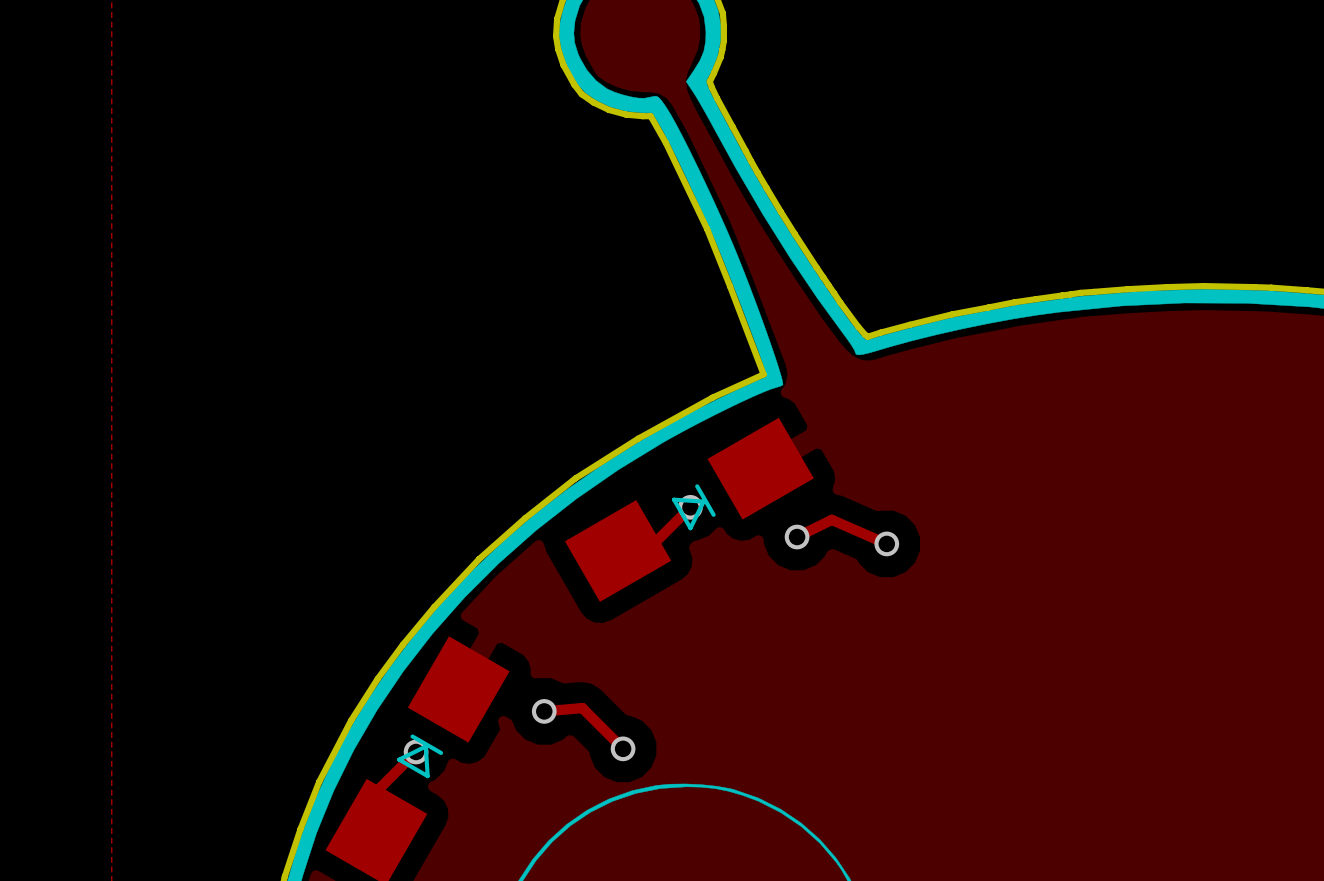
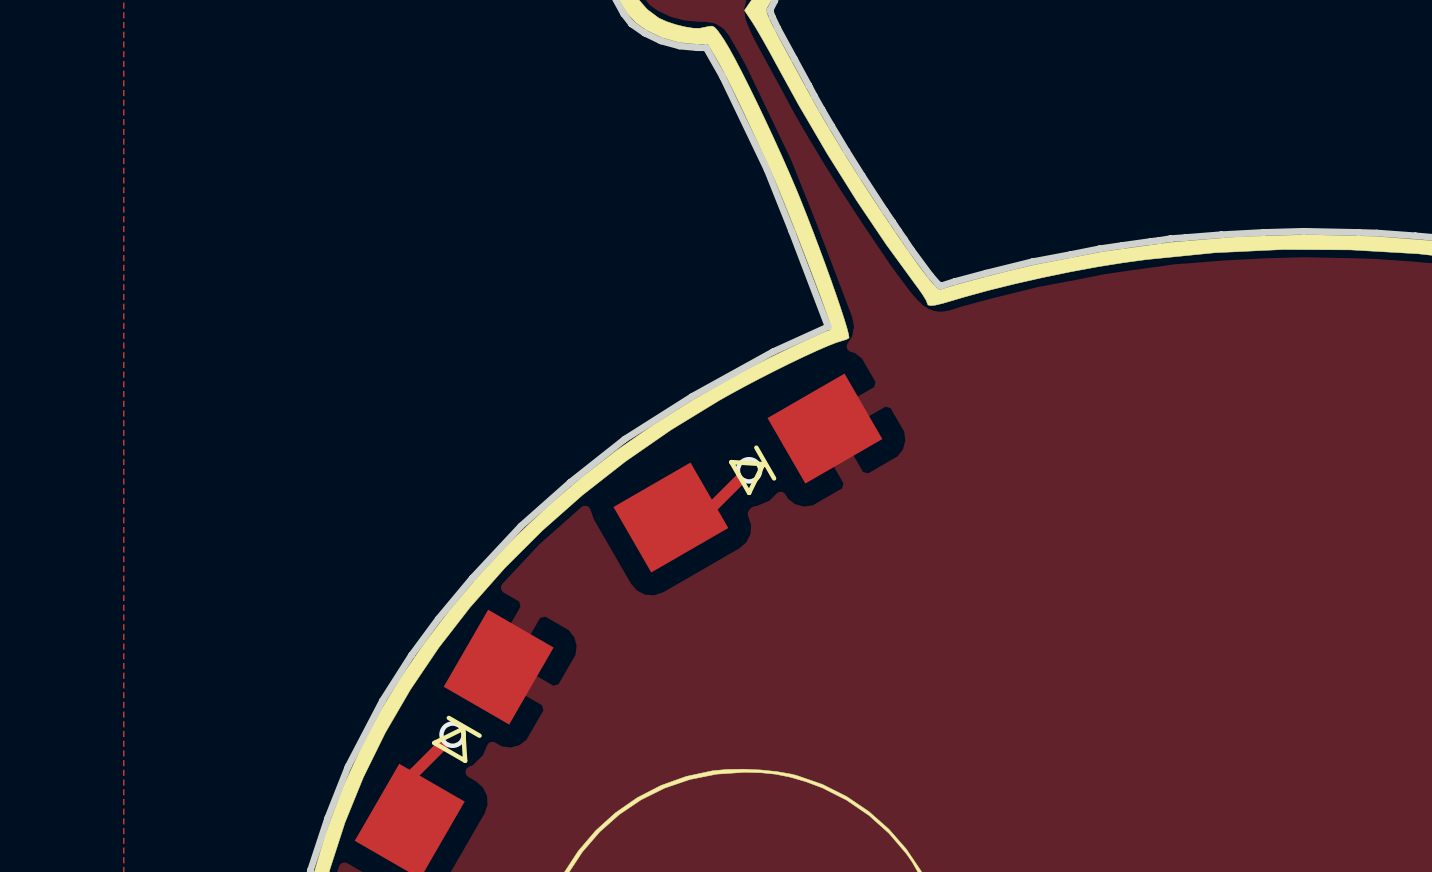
track: (797, 537) (831, 519) (886, 543) -> none
via: (797, 537) -> none
via: (886, 543) -> none
track: (544, 711) (582, 708) (623, 748) -> none
via: (544, 711) -> none
via: (623, 748) -> none

